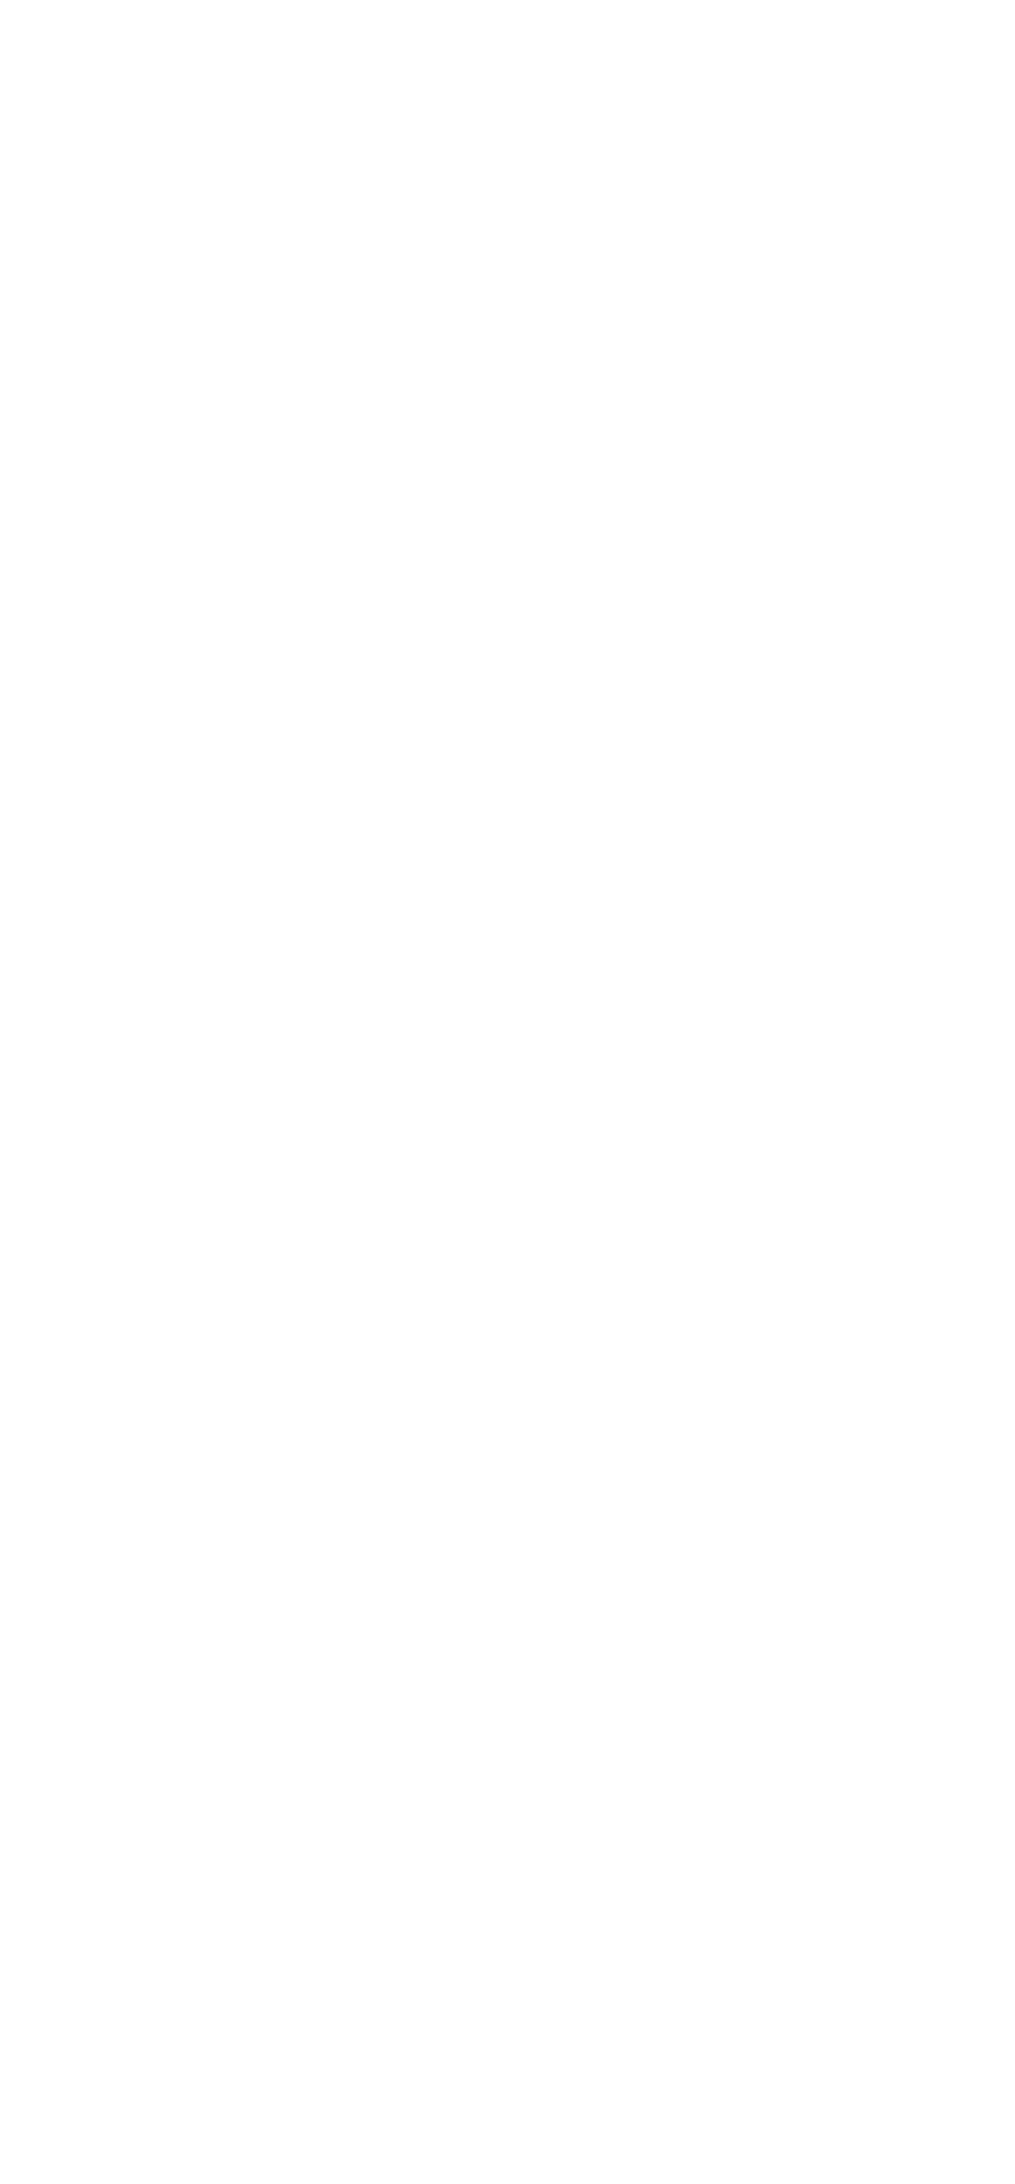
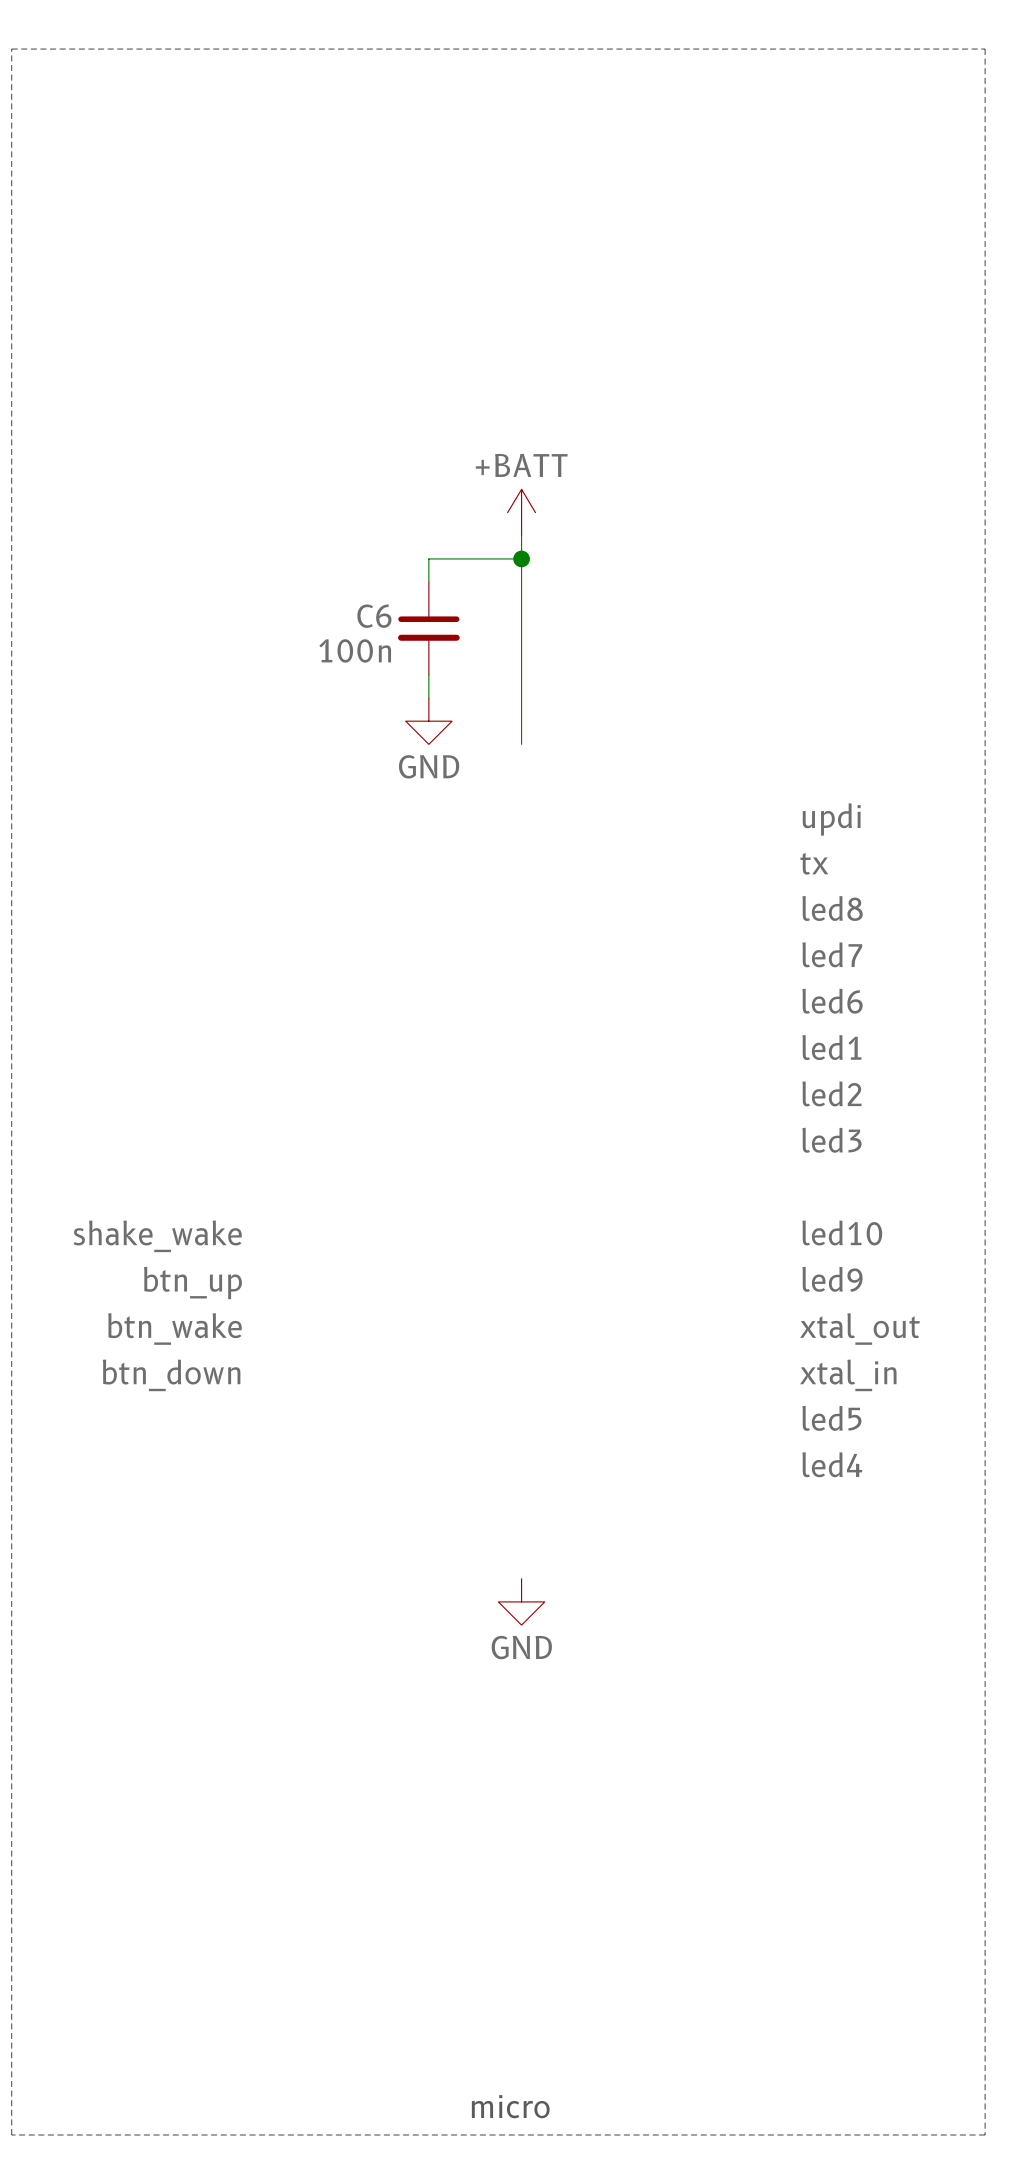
line: none -> (11, 49) (985, 49) (985, 2135) (11, 2135) (11, 49)
power symbol: none -> +BATT (521, 512)
wire: none -> (521, 535) (521, 744)
wire: none -> (521, 558) (428, 558) (428, 582)
junction: none -> (521, 558)
C6: none -> 100n (428, 628)
wire: none -> (428, 674) (428, 698)
power symbol: none -> GND (428, 721)
label: none -> updi (831, 819)
label: none -> tx (814, 863)
label: none -> led8 (832, 908)
label: none -> led7 (832, 954)
label: none -> led6 (832, 1001)
label: none -> led1 (831, 1047)
label: none -> led2 (832, 1093)
label: none -> led3 (832, 1140)
label: none -> led10 (842, 1232)
label: none -> shake_wake (157, 1236)
label: none -> led9 (832, 1279)
label: none -> btn_up (192, 1282)
label: none -> btn_wake (174, 1329)
label: none -> xtal_out (859, 1329)
label: none -> btn_down (171, 1375)
label: none -> xtal_in (848, 1375)
label: none -> led5 (831, 1418)
label: none -> led4 (832, 1464)
power symbol: none -> GND (521, 1601)
text: none -> micro (510, 2106)

